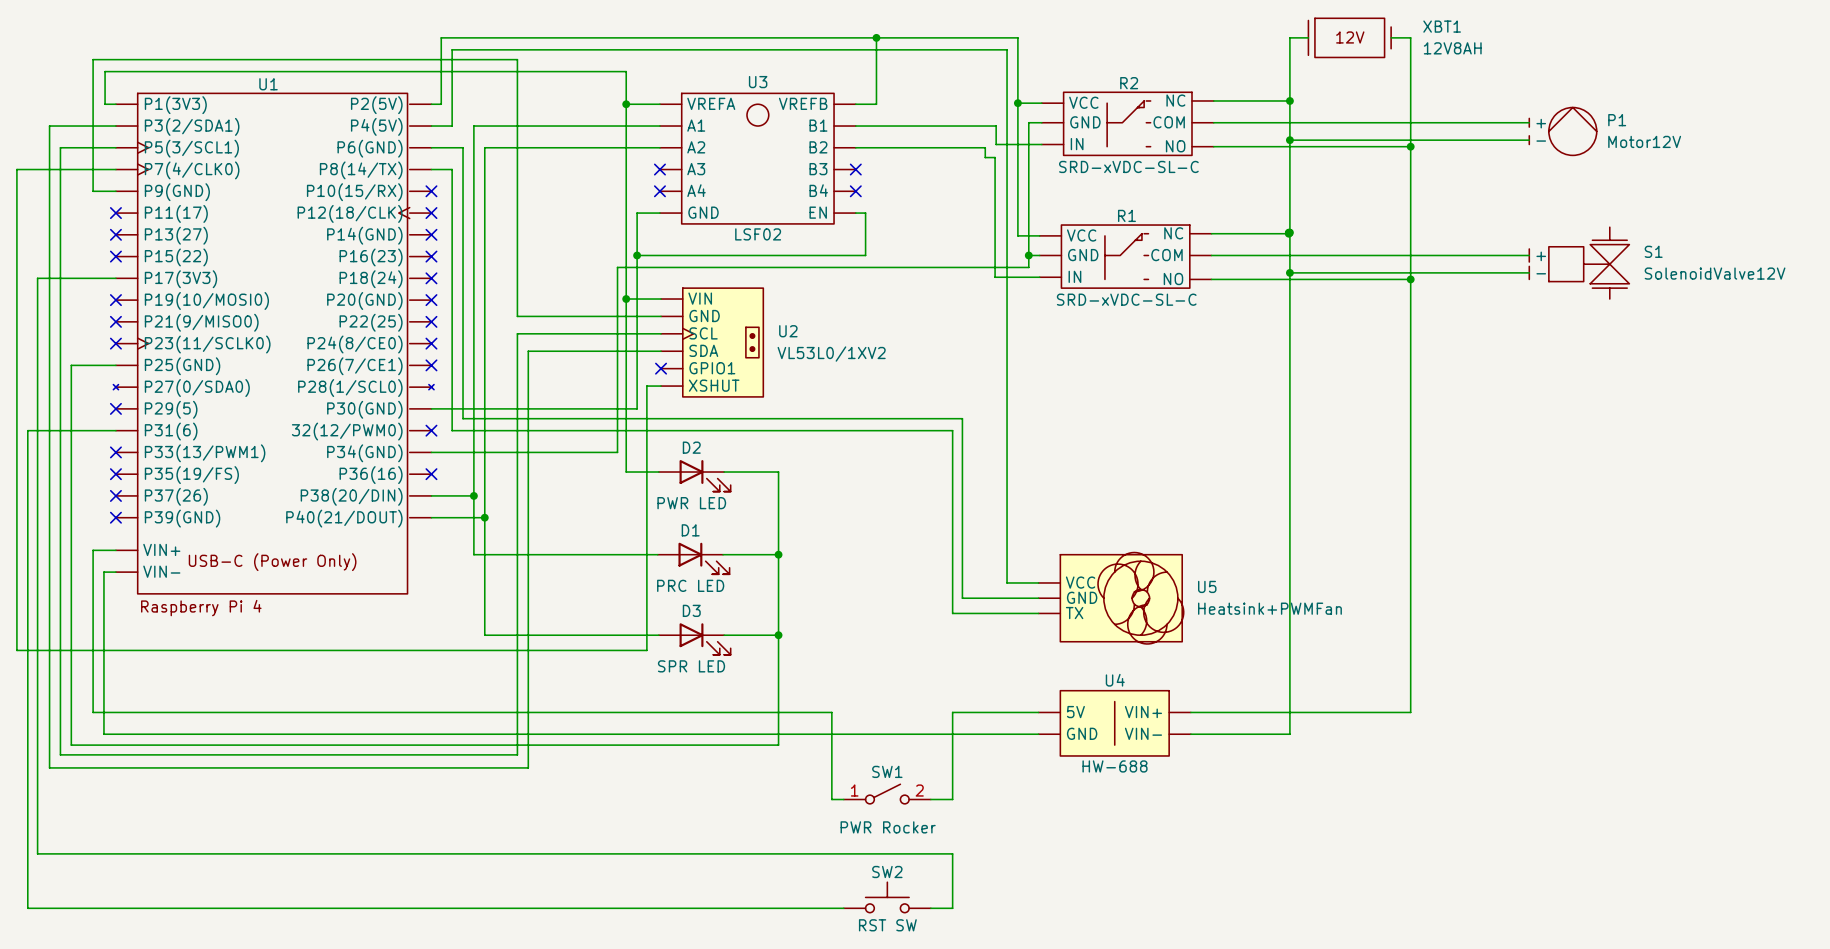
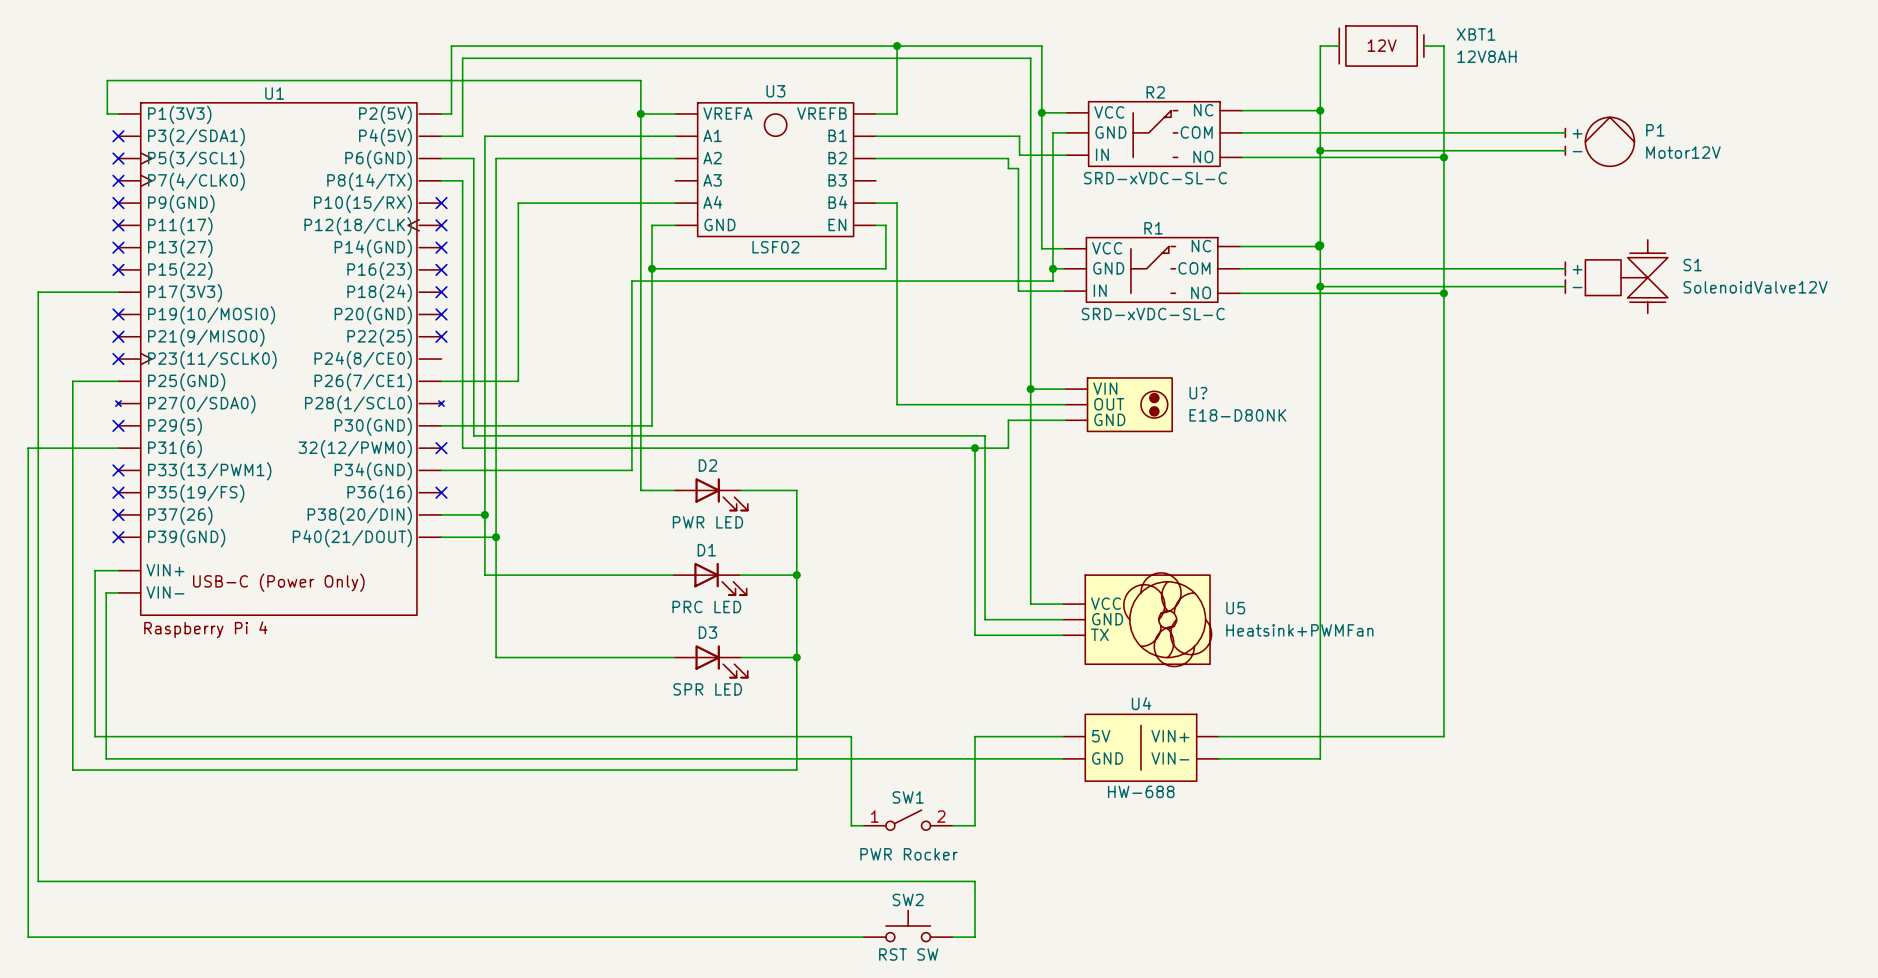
wire: (115, 126) (49, 126) (49, 767) (528, 767) (528, 351) (661, 351) -> none
no-connect mark: none -> (118, 136)
wire: (115, 147) (60, 147) (60, 754) (517, 754) (517, 333) (661, 333) -> none
no-connect mark: none -> (118, 158)
wire: (115, 169) (16, 169) (16, 650) (646, 650) (646, 386) (661, 386) -> none
no-connect mark: none -> (118, 180)
no-connect mark: (659, 169) -> none
no-connect mark: (855, 169) -> none
wire: (115, 191) (93, 191) (93, 59) (517, 59) (517, 316) (661, 316) -> none
no-connect mark: none -> (118, 203)
wire: none -> (675, 203) (518, 203) (518, 381) (441, 381)
no-connect mark: (659, 191) -> none
wire: none -> (875, 203) (897, 203) (897, 404) (1065, 404)
no-connect mark: (855, 191) -> none
wire: (626, 299) (661, 299) -> none
junction: (626, 299) -> none
U2: VL53L0/1XV2 (712, 342) -> none
no-connect mark: (431, 343) -> none
no-connect mark: (431, 365) -> none
no-connect mark: (661, 368) -> none
wire: none -> (1030, 389) (1065, 389)
junction: none -> (1030, 389)
U?: none -> E18-D80NK (1118, 404)
wire: none -> (1065, 420) (1008, 420) (1008, 448) (975, 448)
junction: none -> (975, 448)

